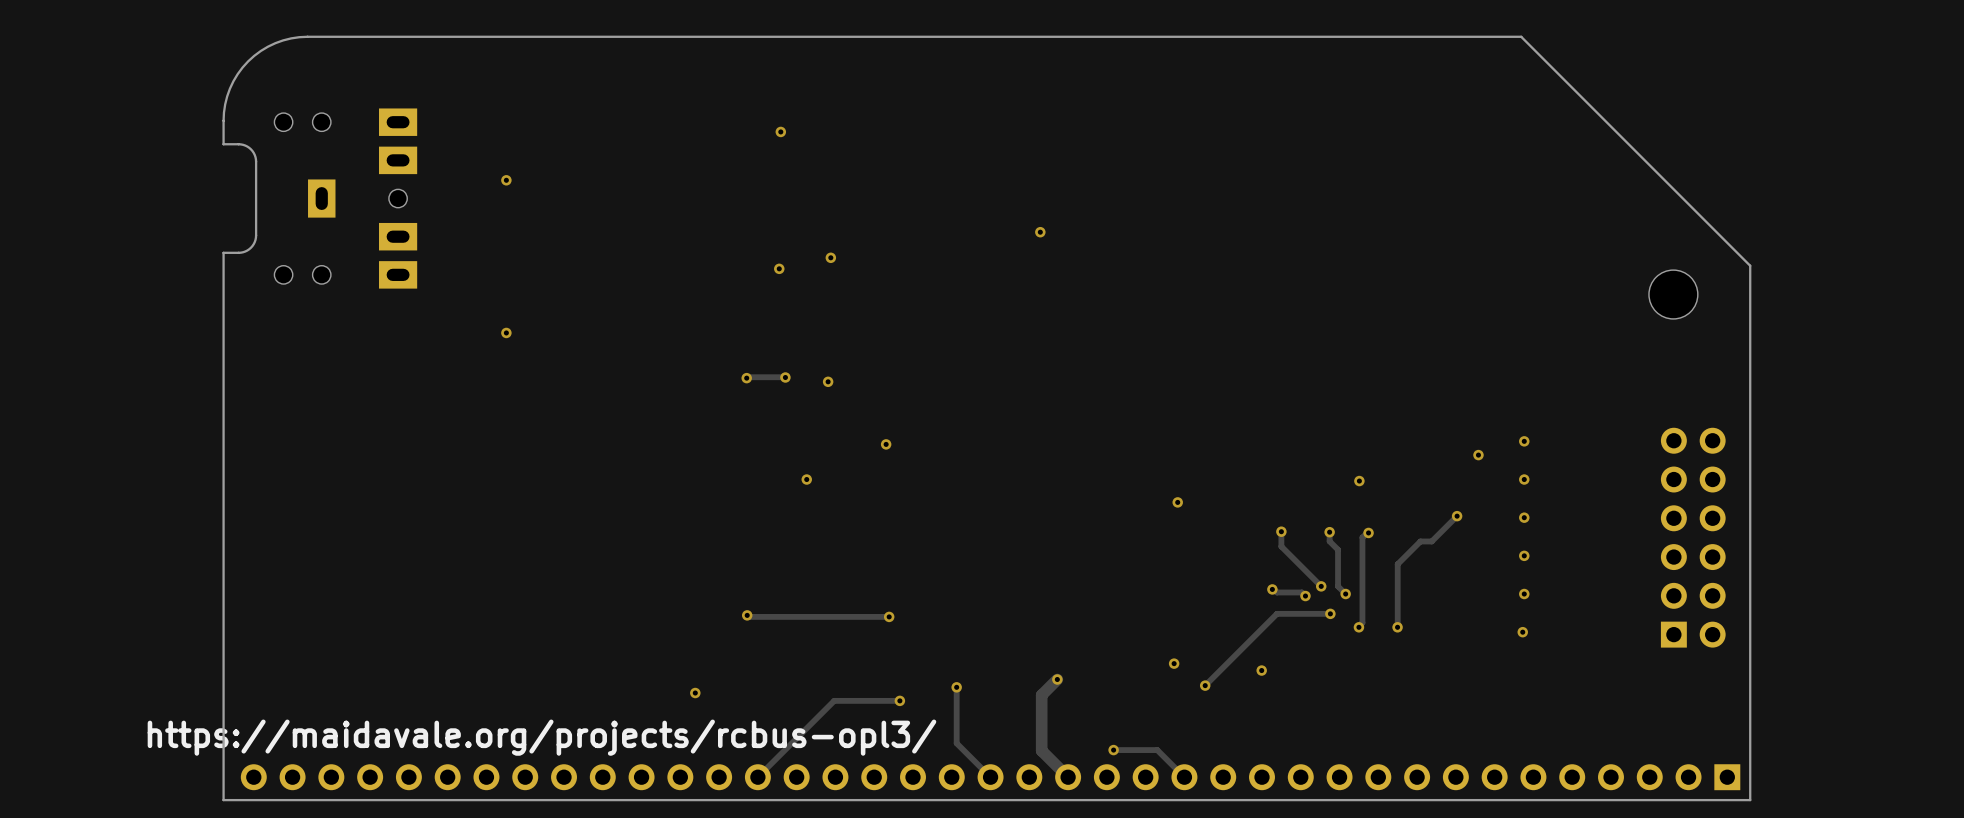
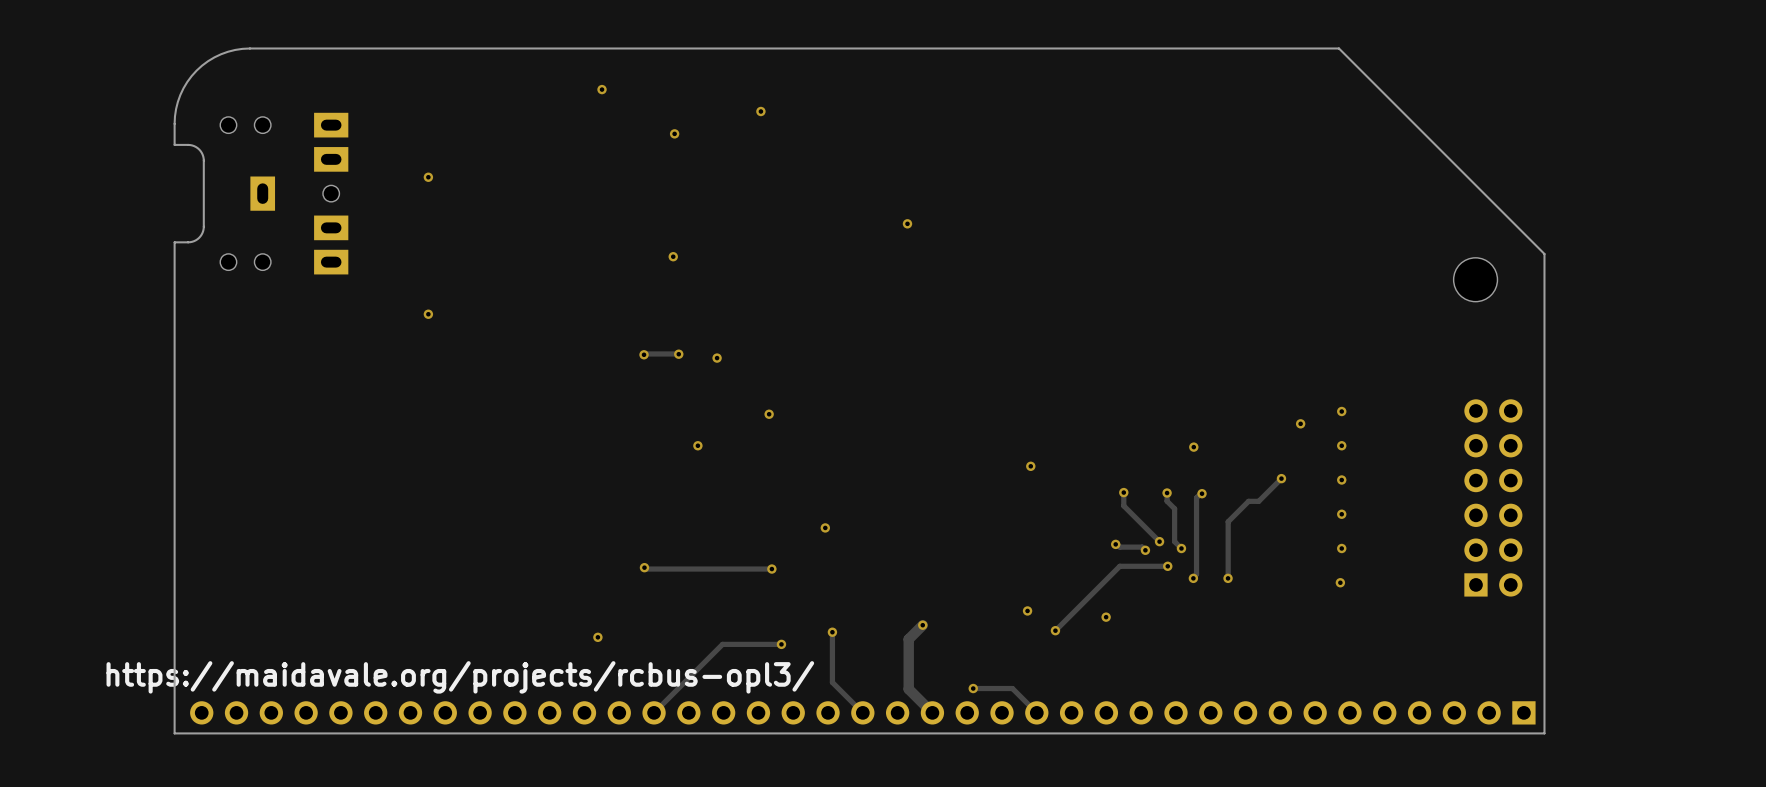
via: none -> (602, 89)
via: none -> (760, 111)
via: (830, 257) -> none
via: none -> (825, 527)

